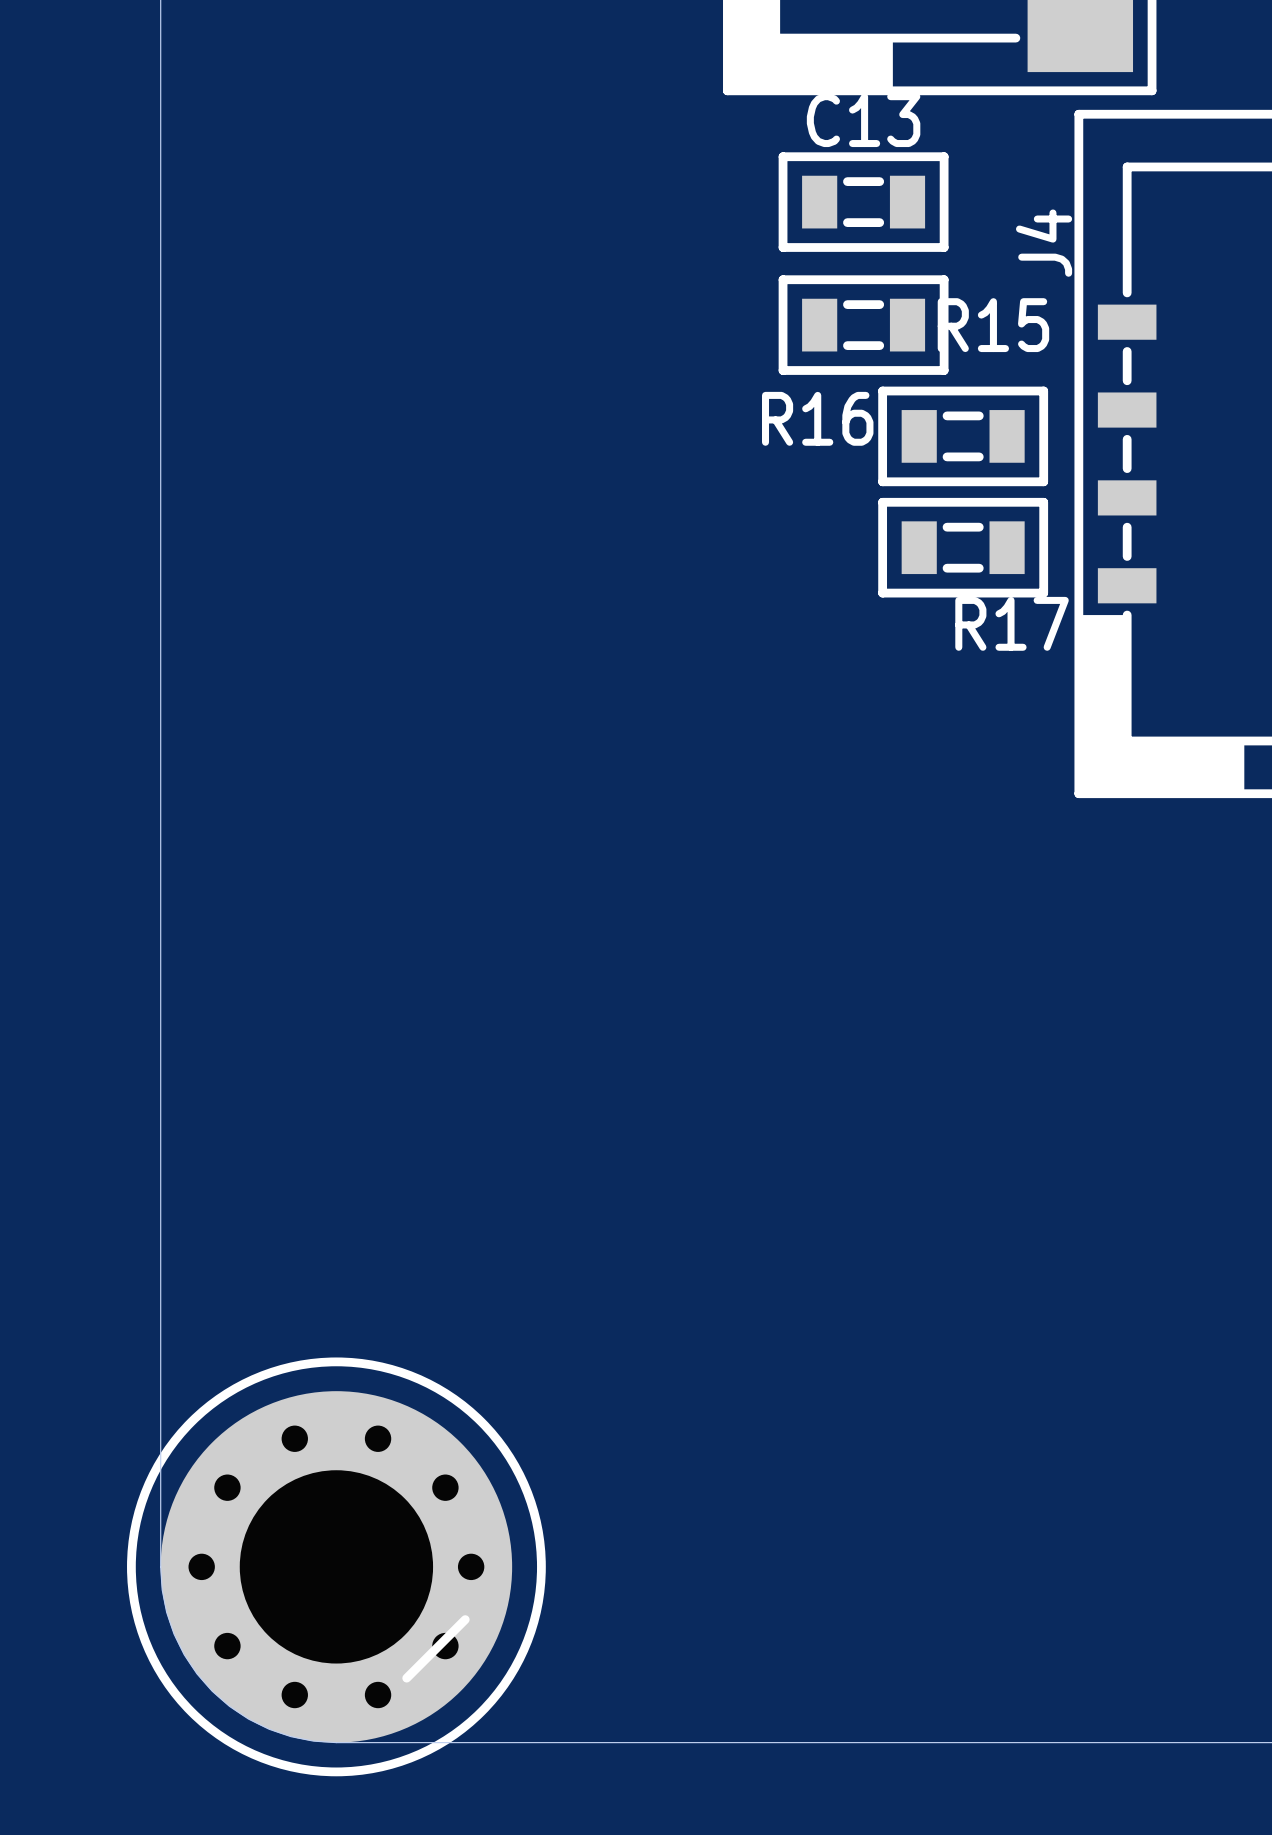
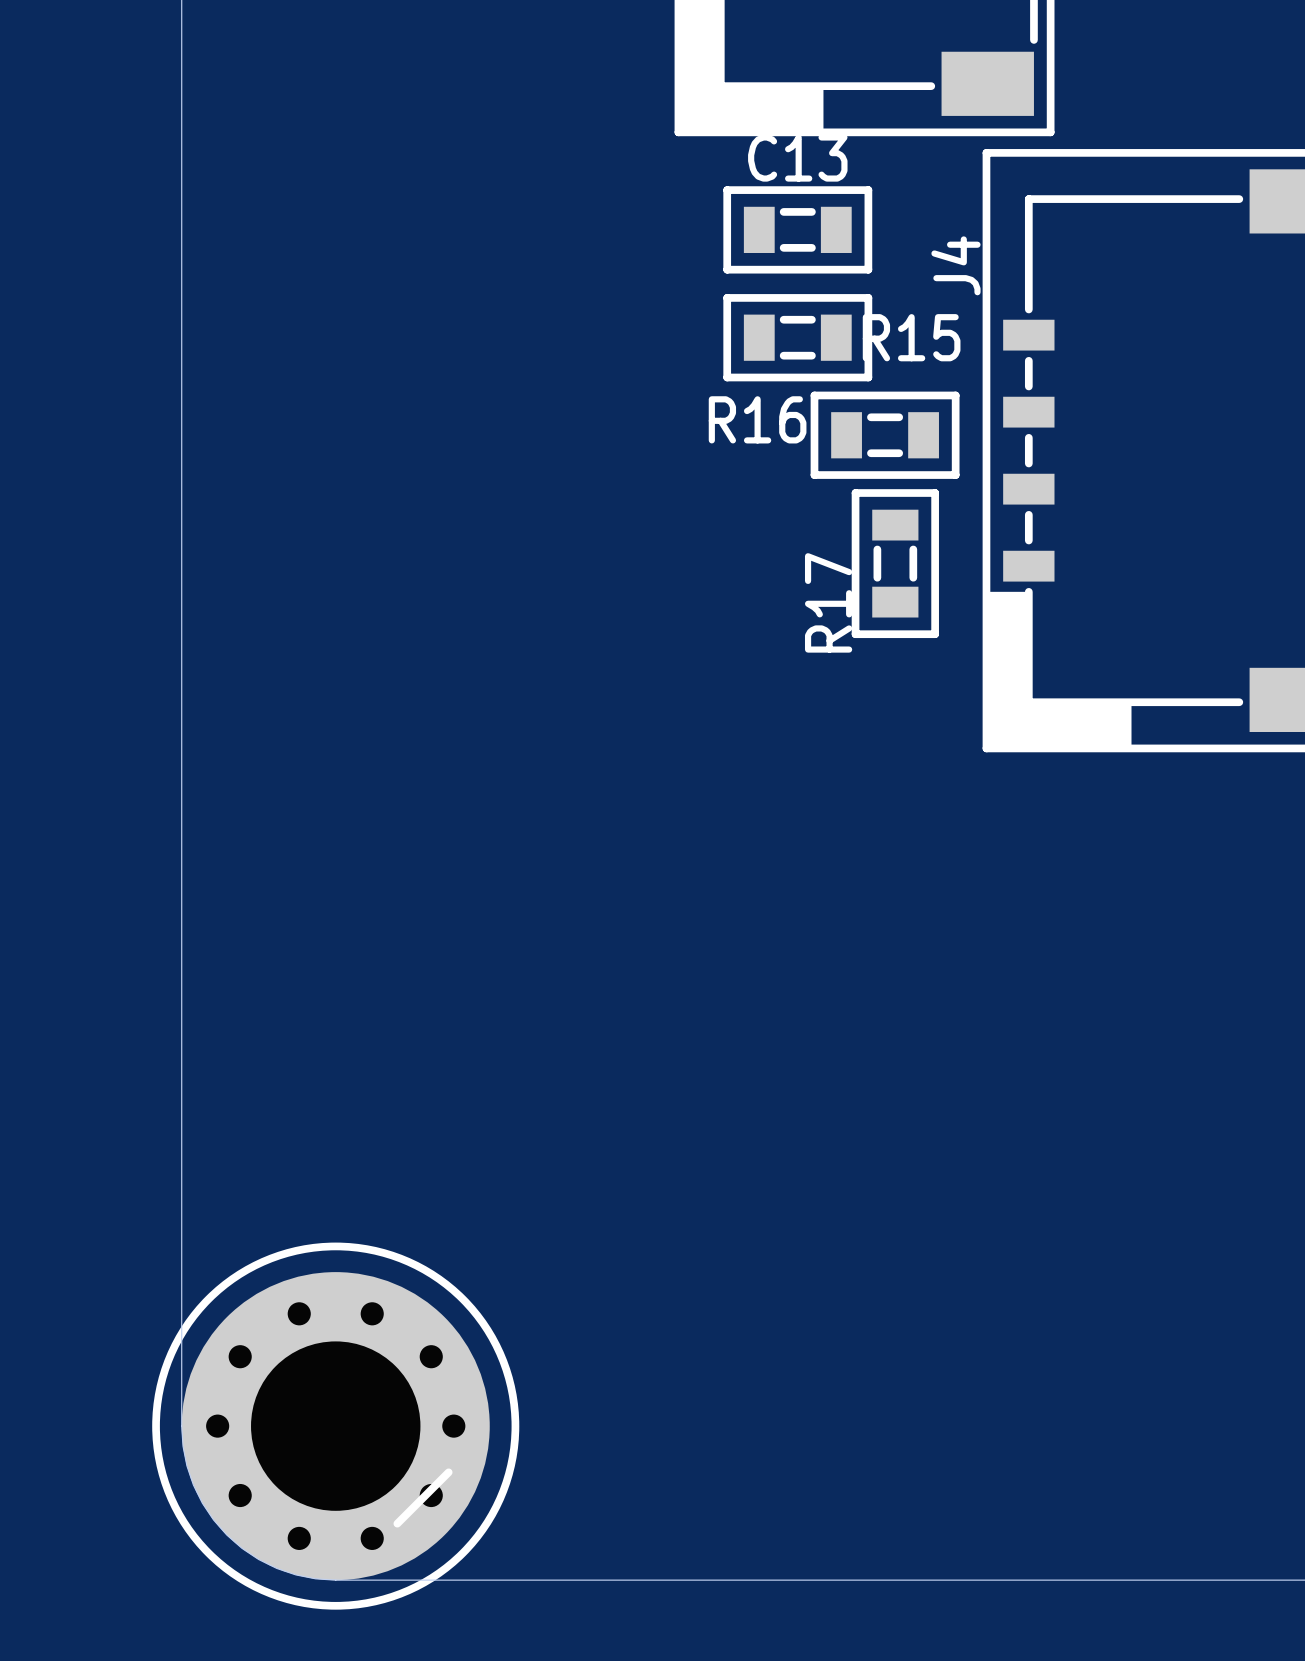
R17 rotation: 0° (963, 547) -> 90° clockwise (895, 563)

